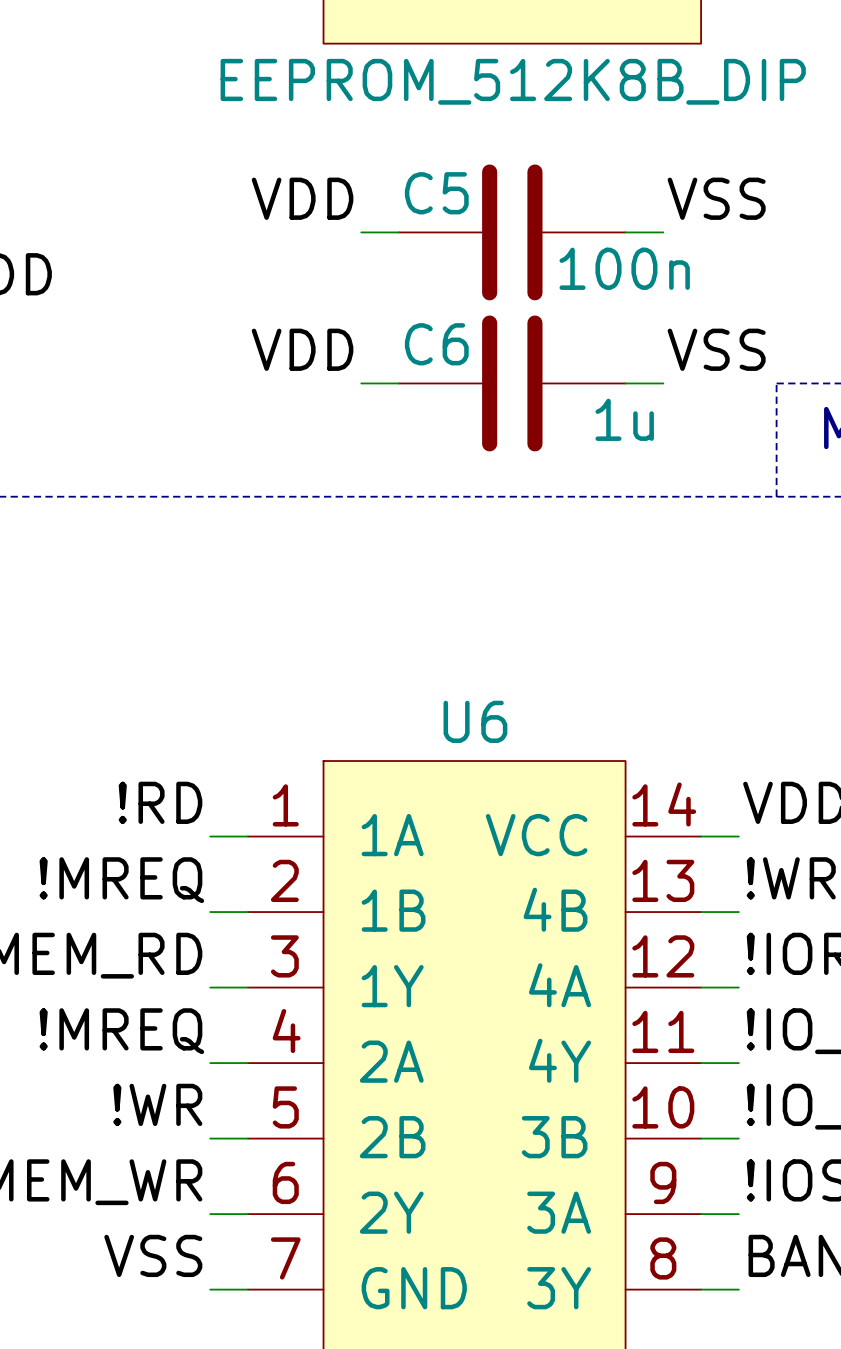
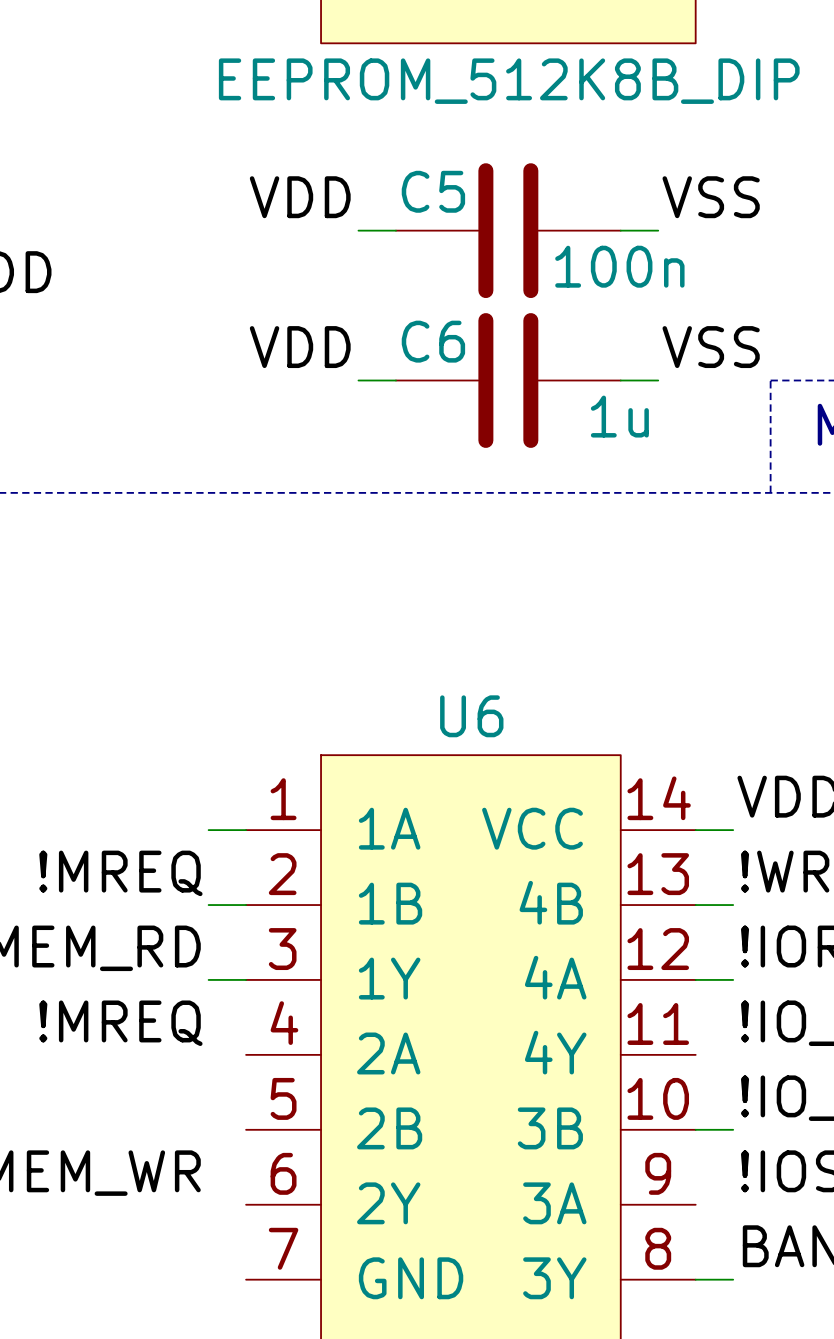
label: !RD (160, 802) -> none
wire: (210, 1063) (248, 1063) -> none
wire: (701, 1063) (738, 1063) -> none
label: !WR (157, 1104) -> none
wire: (210, 1138) (248, 1138) -> none
wire: (210, 1214) (248, 1214) -> none
wire: (701, 1214) (738, 1214) -> none
label: VSS (153, 1255) -> none
wire: (210, 1289) (248, 1289) -> none

